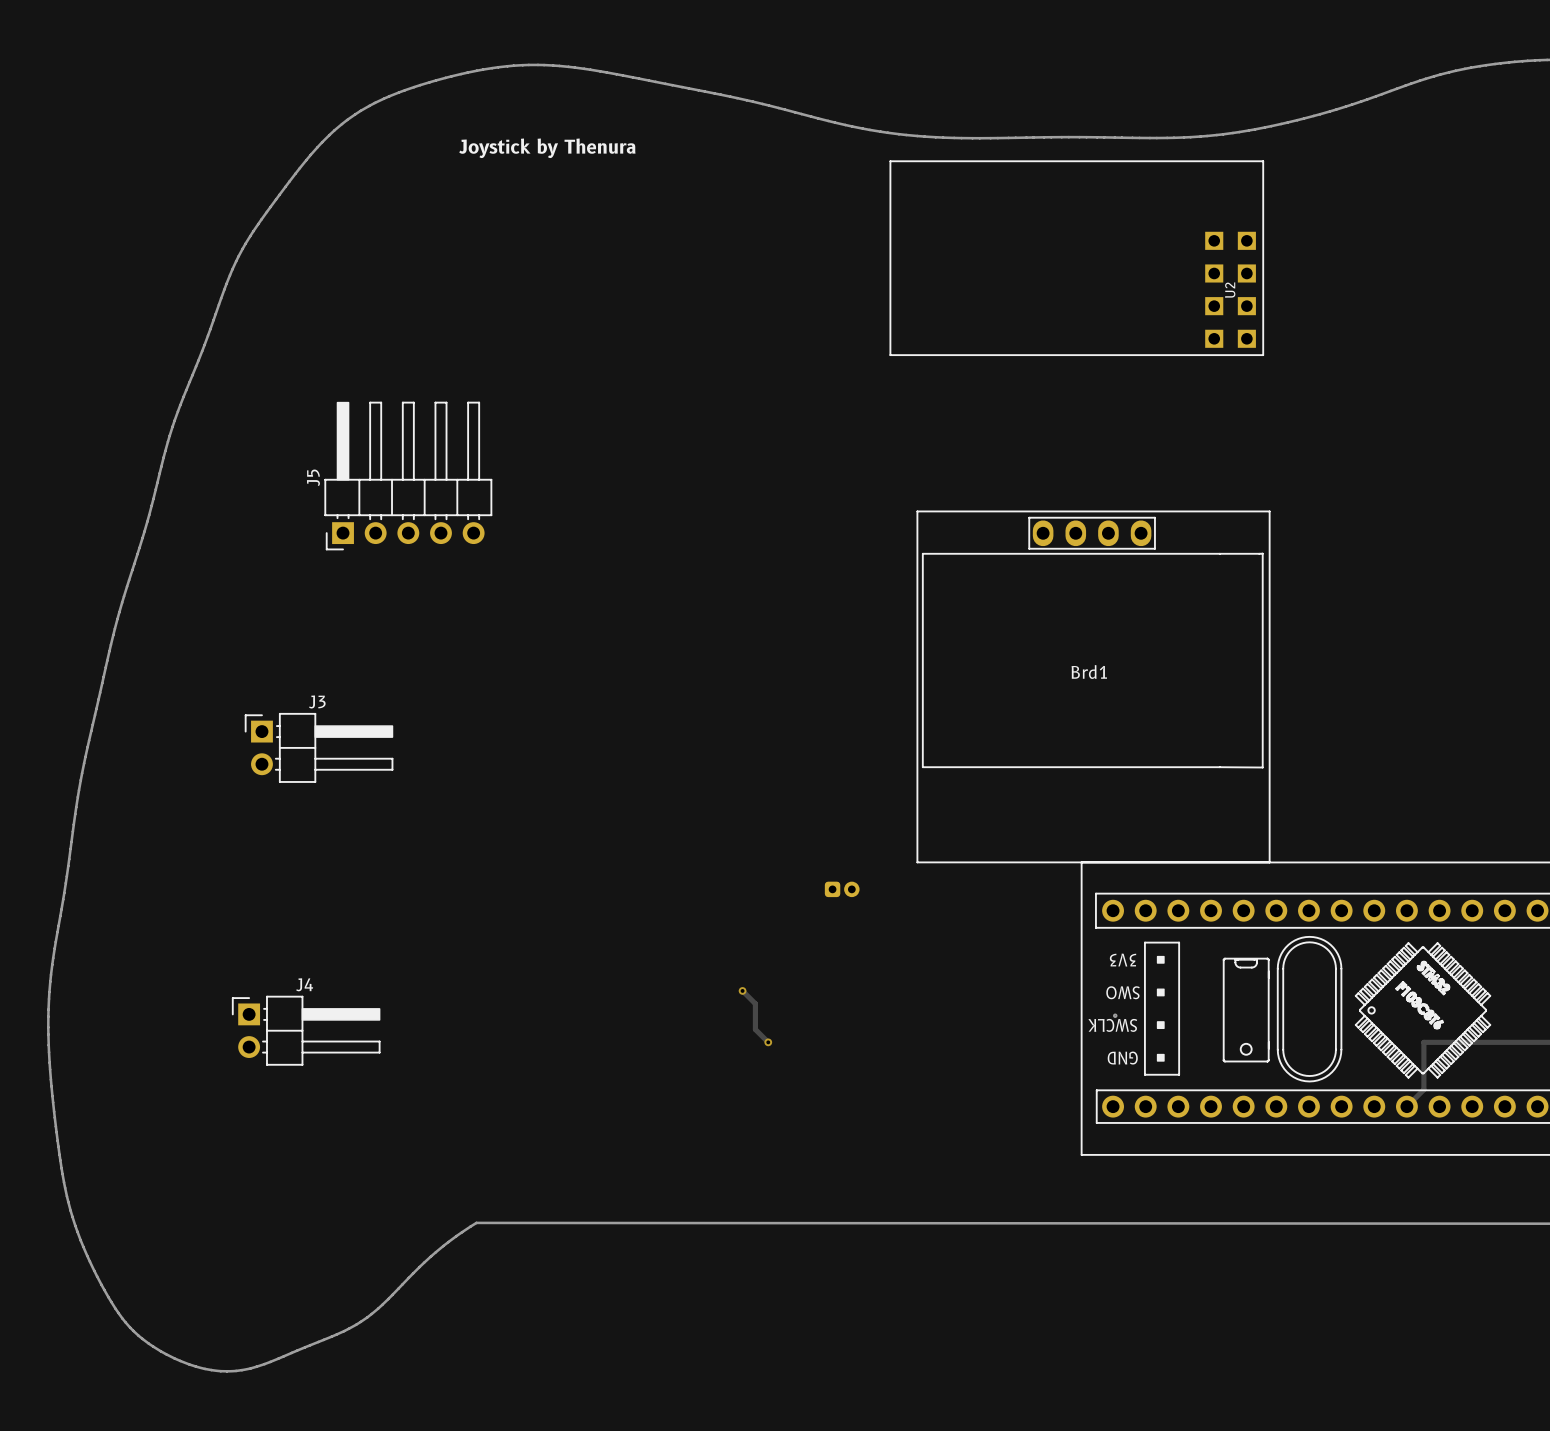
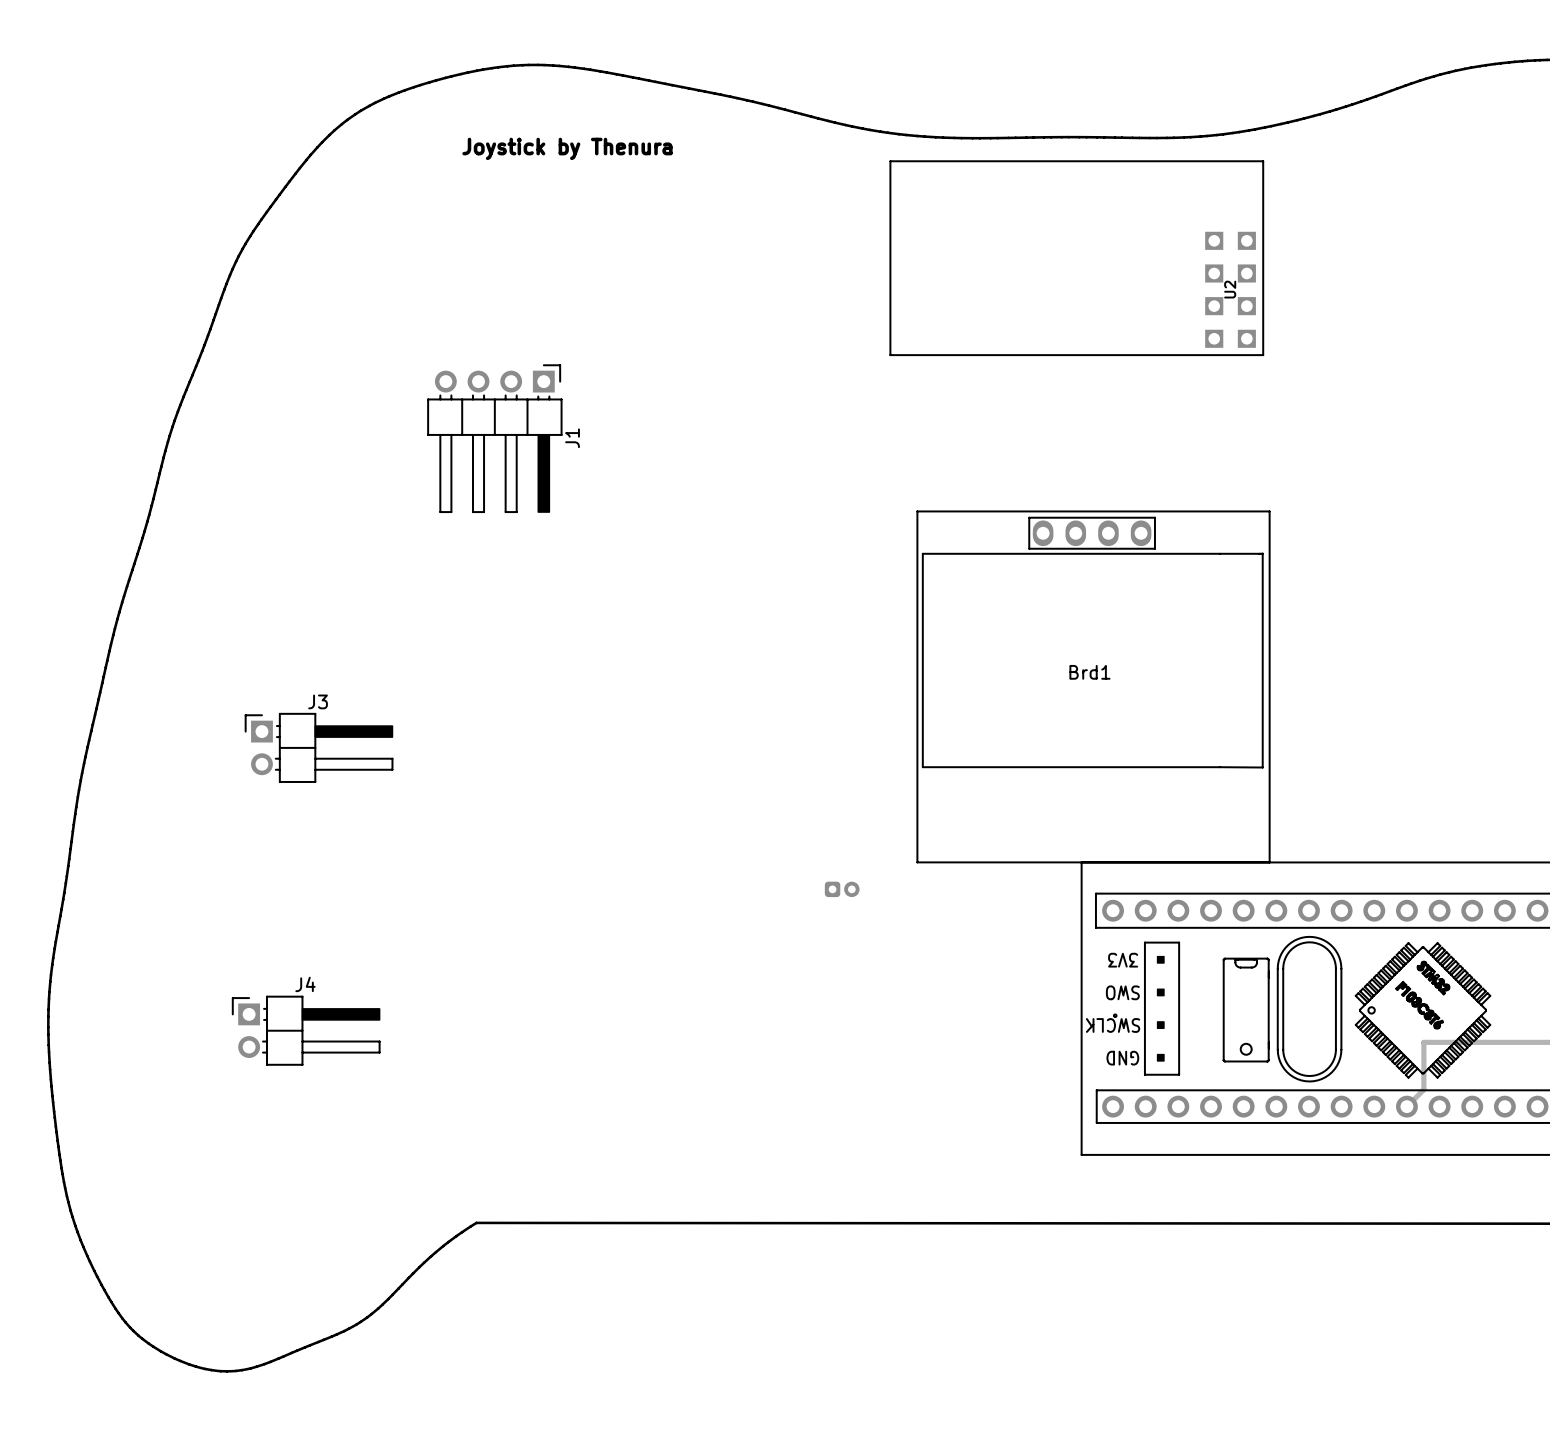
J1: none -> (494, 438)
J5: (408, 476) -> none
track: (742, 990) (755, 1003) (755, 1029) (768, 1042) -> none
via: (742, 990) -> none
via: (768, 1042) -> none

